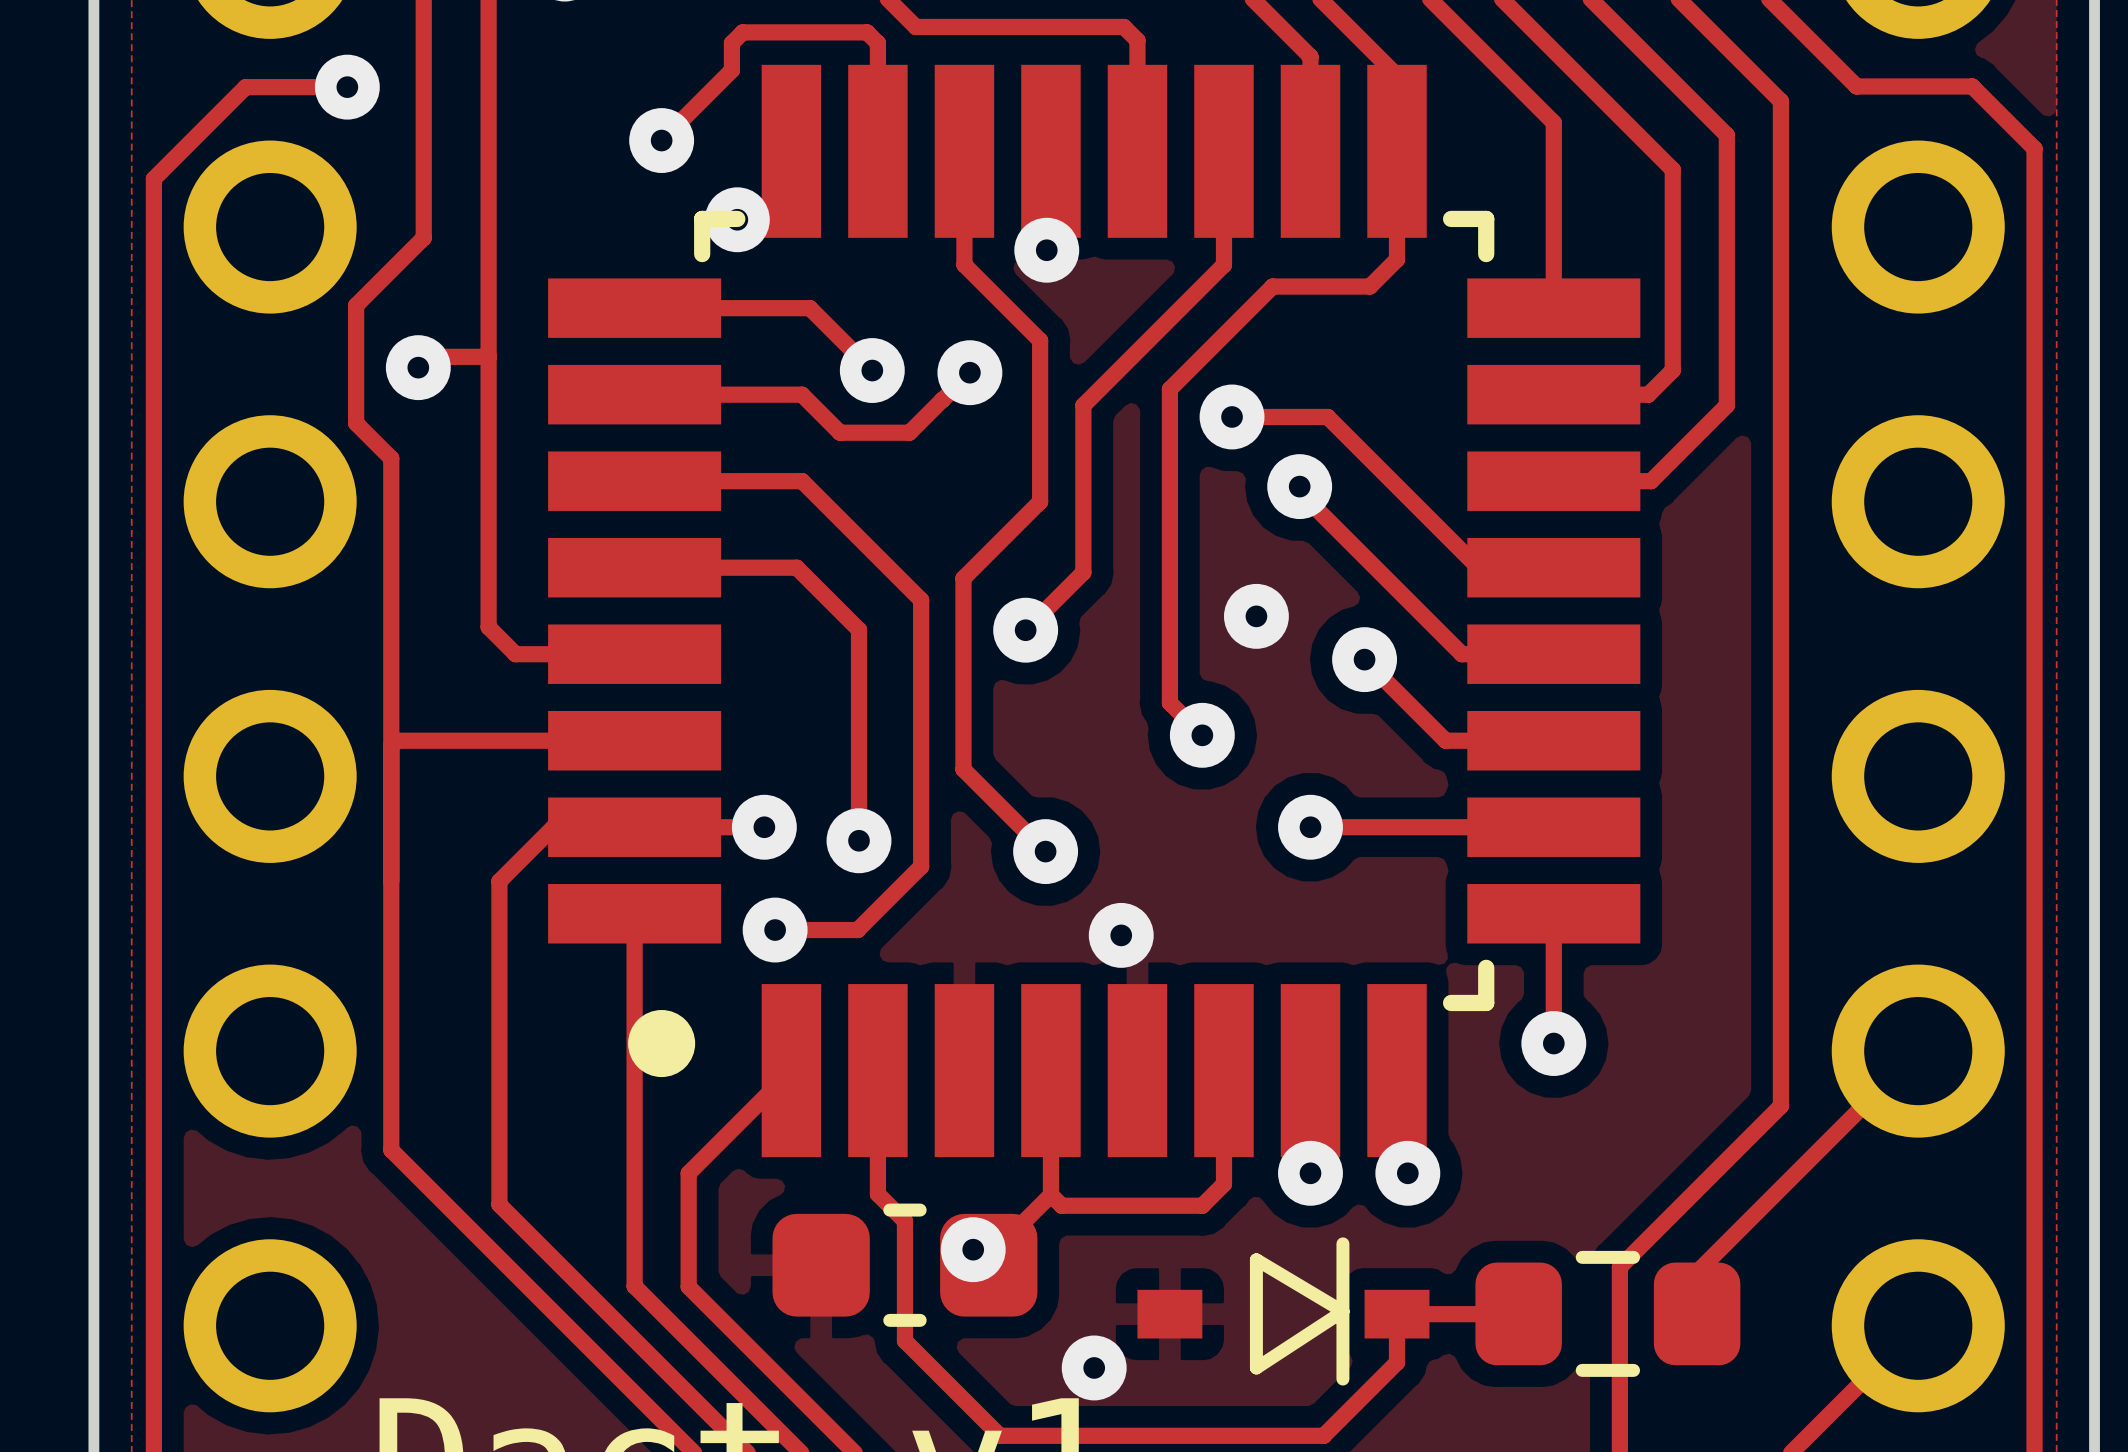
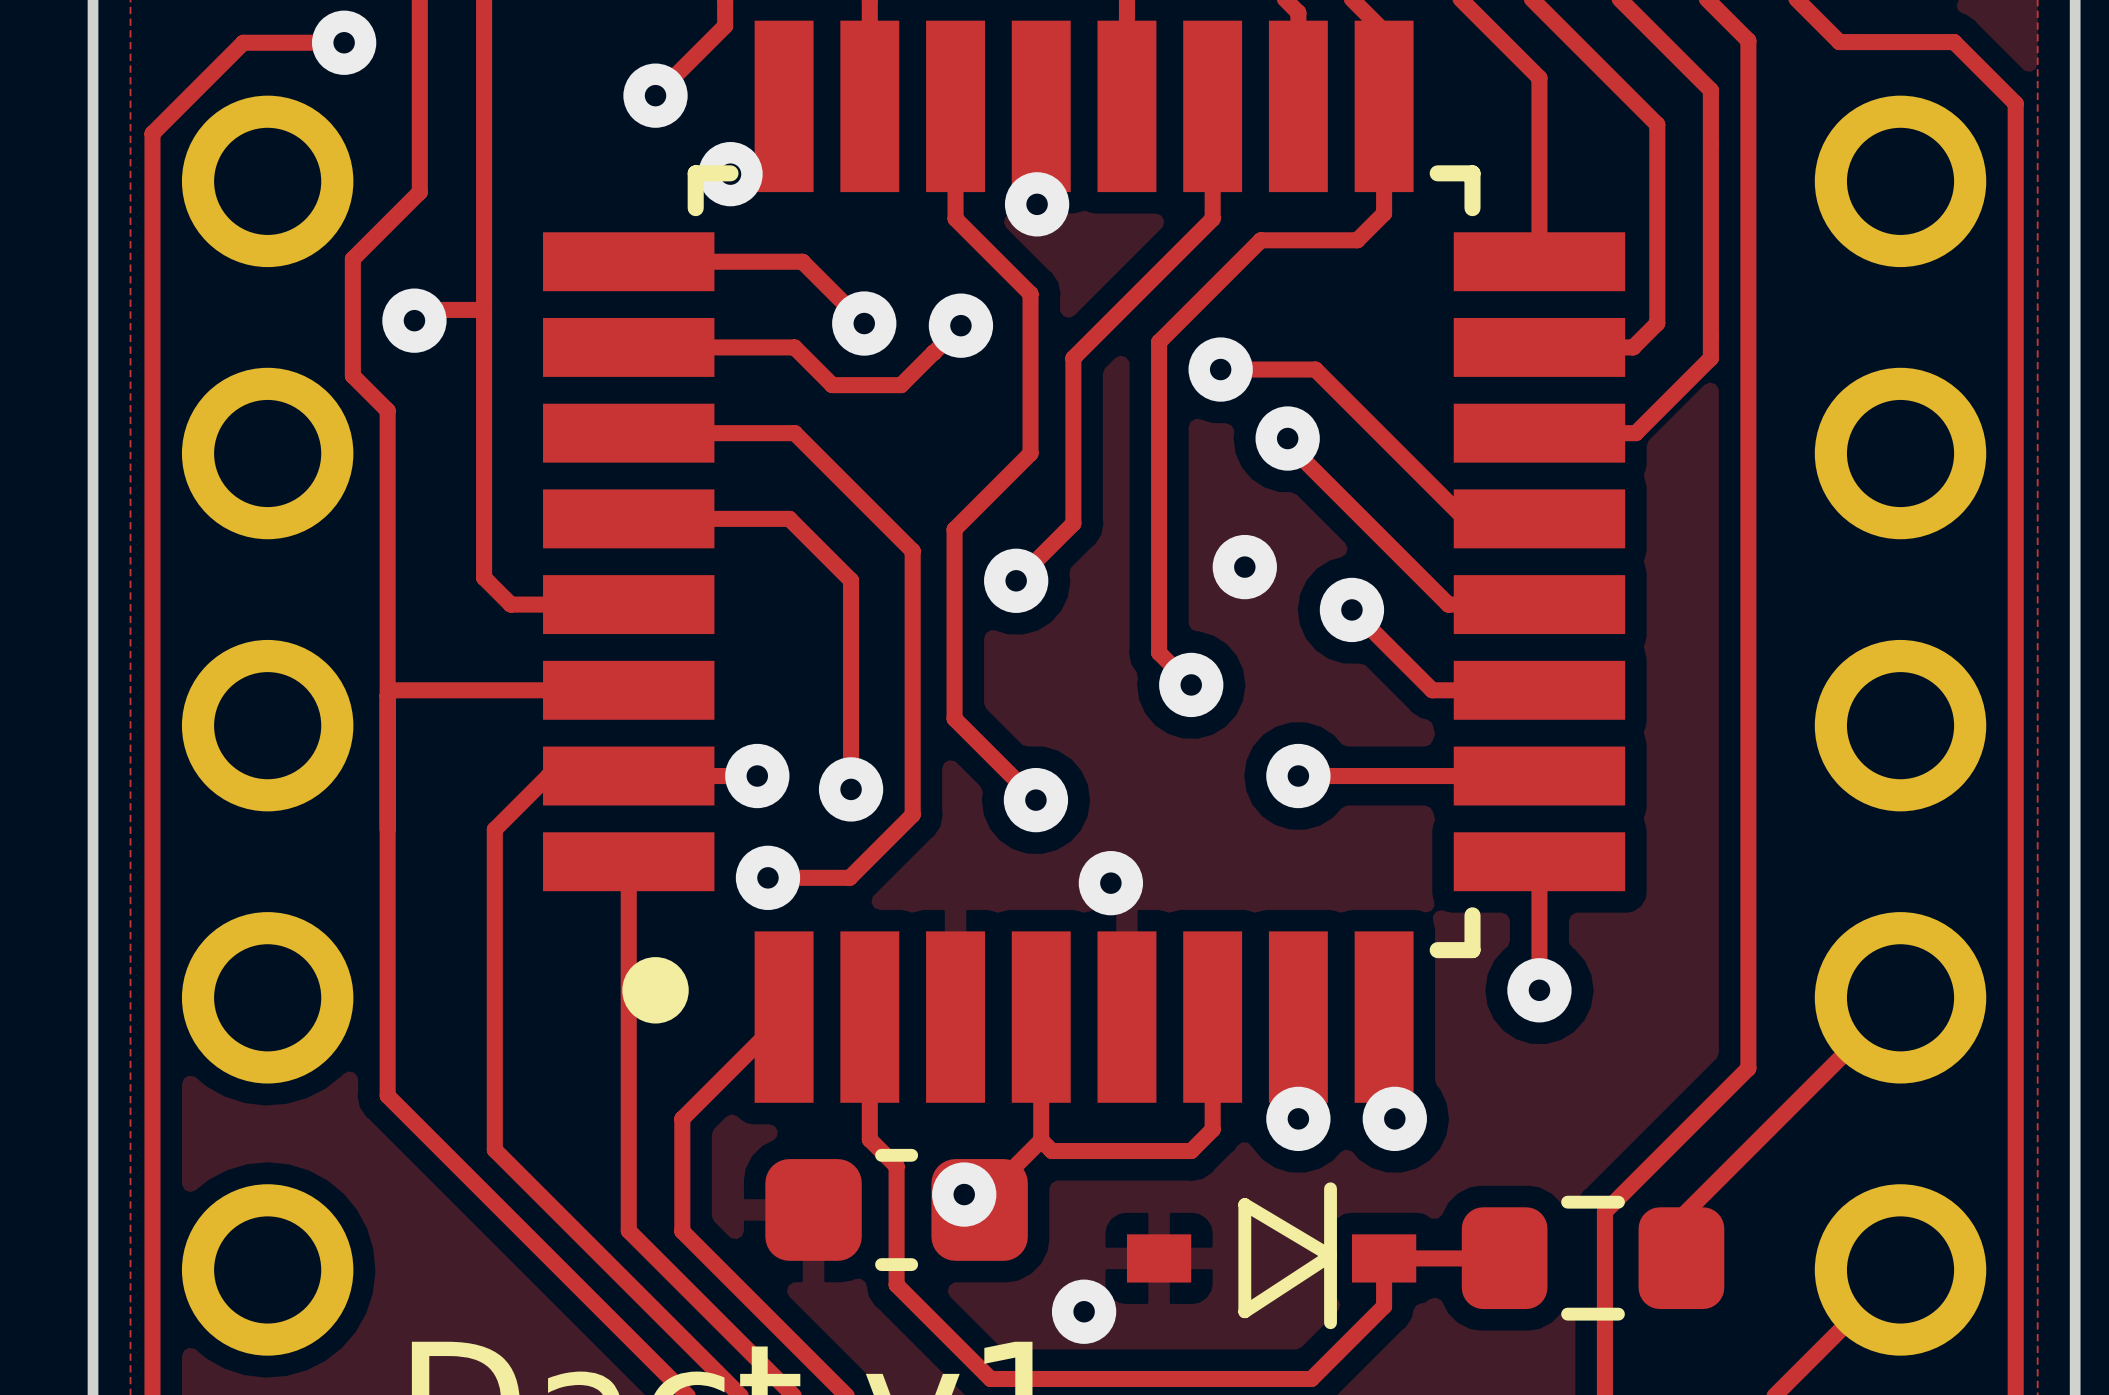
track: (1764, 85) (1780, 101) (1780, 1106) (1764, 1122) -> (1748, 40) (1748, 1068)

